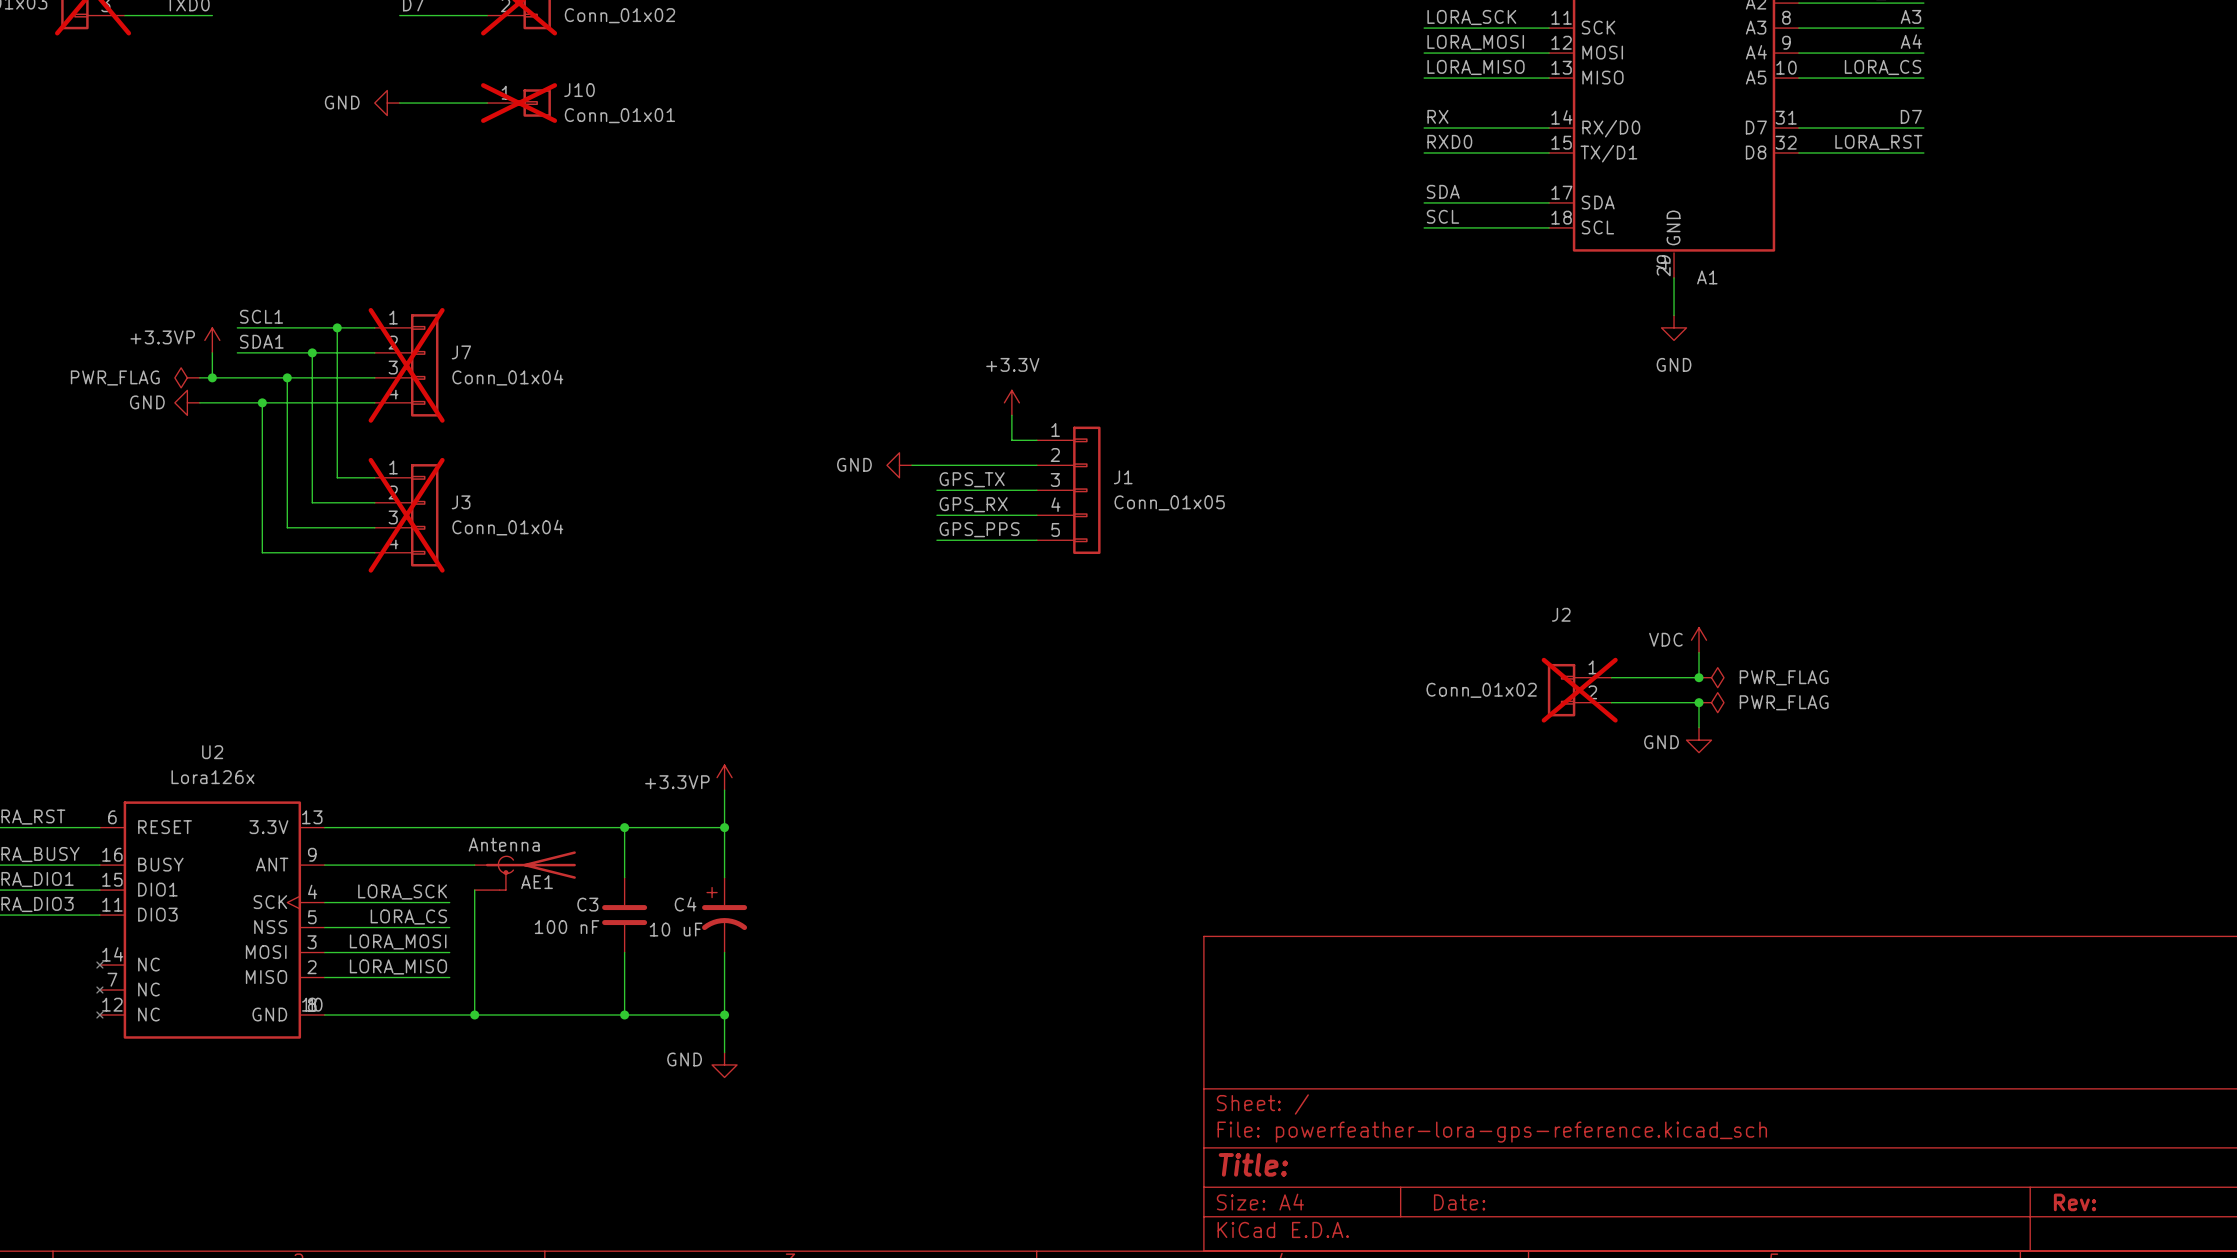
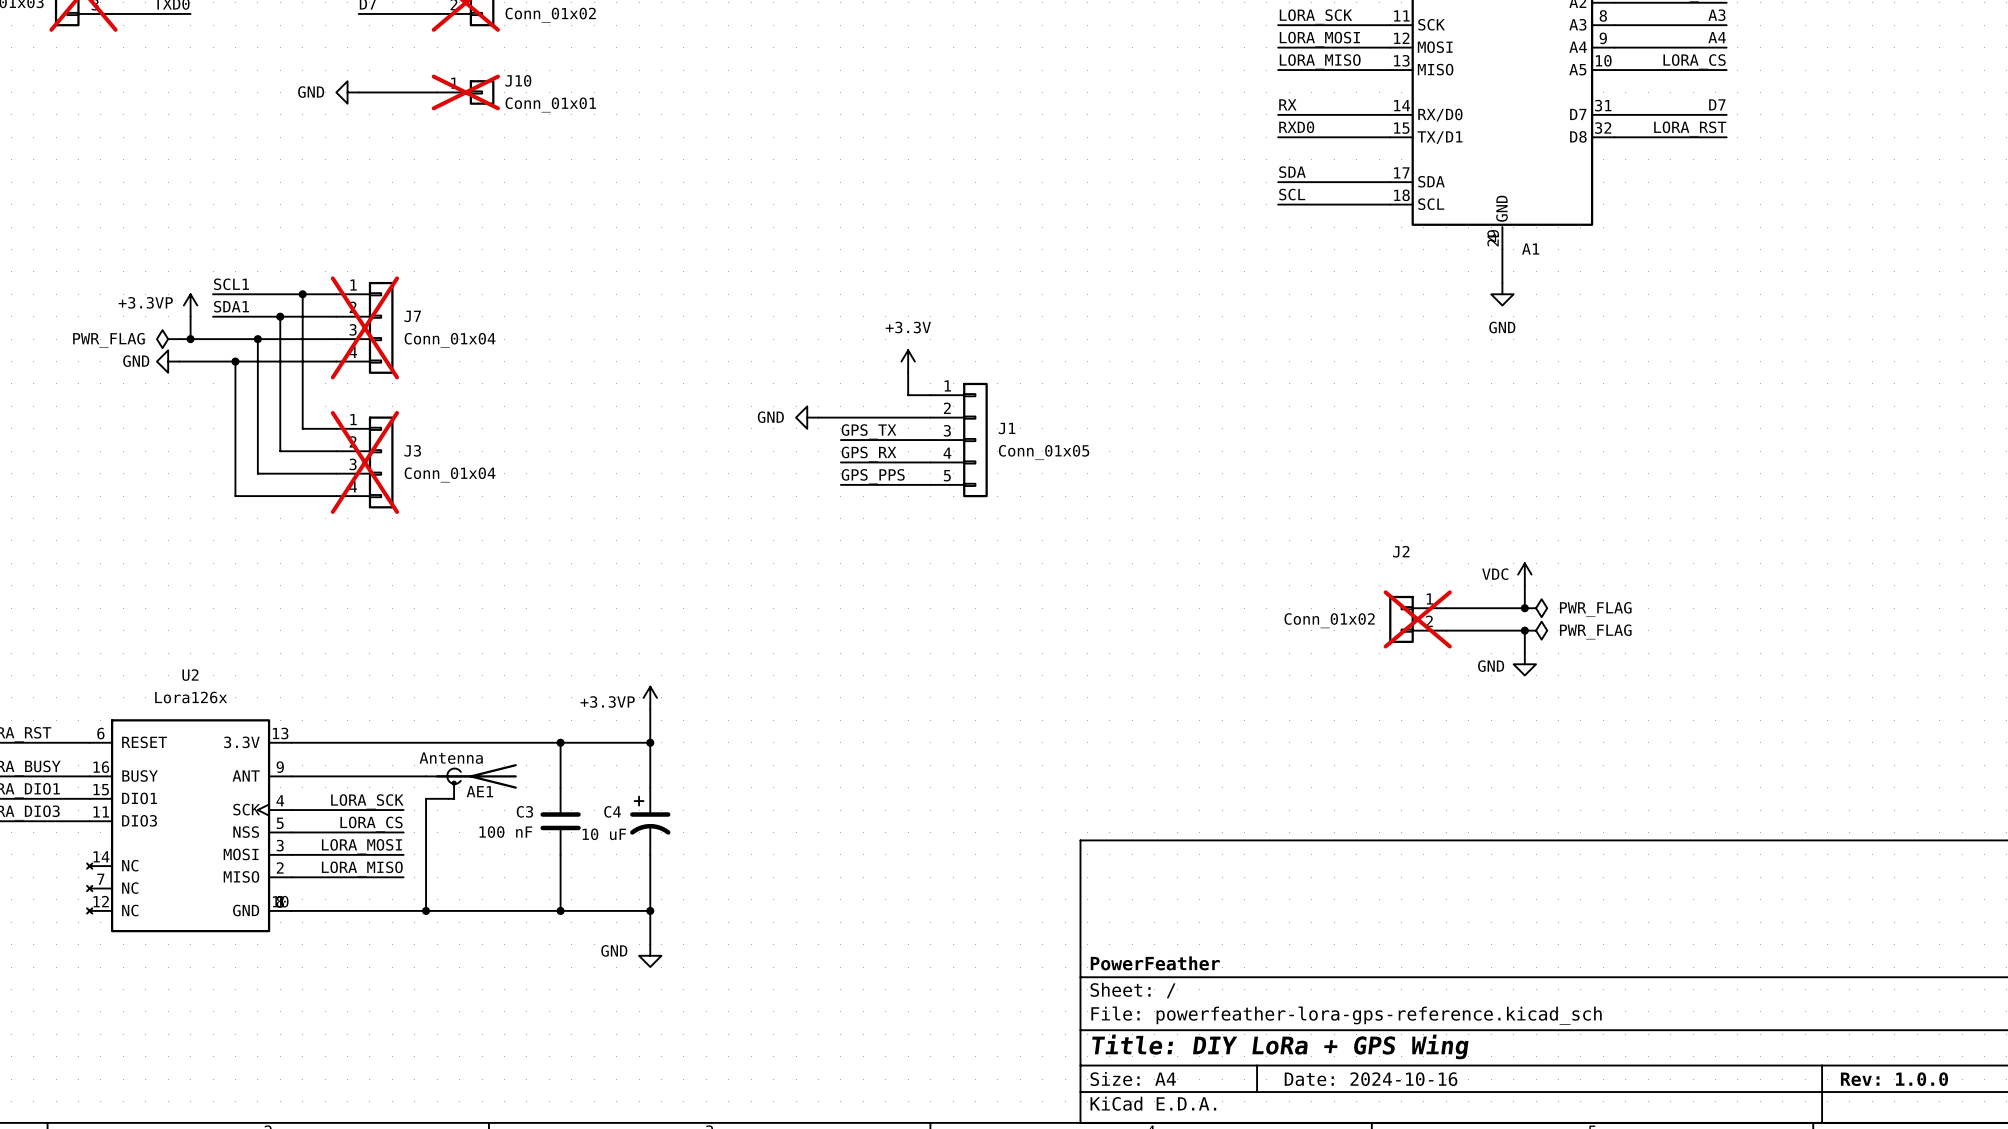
title block: none -> PowerFeather (1155, 963)
title block: Title: (1253, 1164) -> Title: DIY LoRa + GPS Wing (1280, 1046)
title block: Date: (1459, 1202) -> Date: 2024-10-16 (1371, 1079)
title block: Rev: (2075, 1202) -> Rev: 1.0.0 (1894, 1079)

